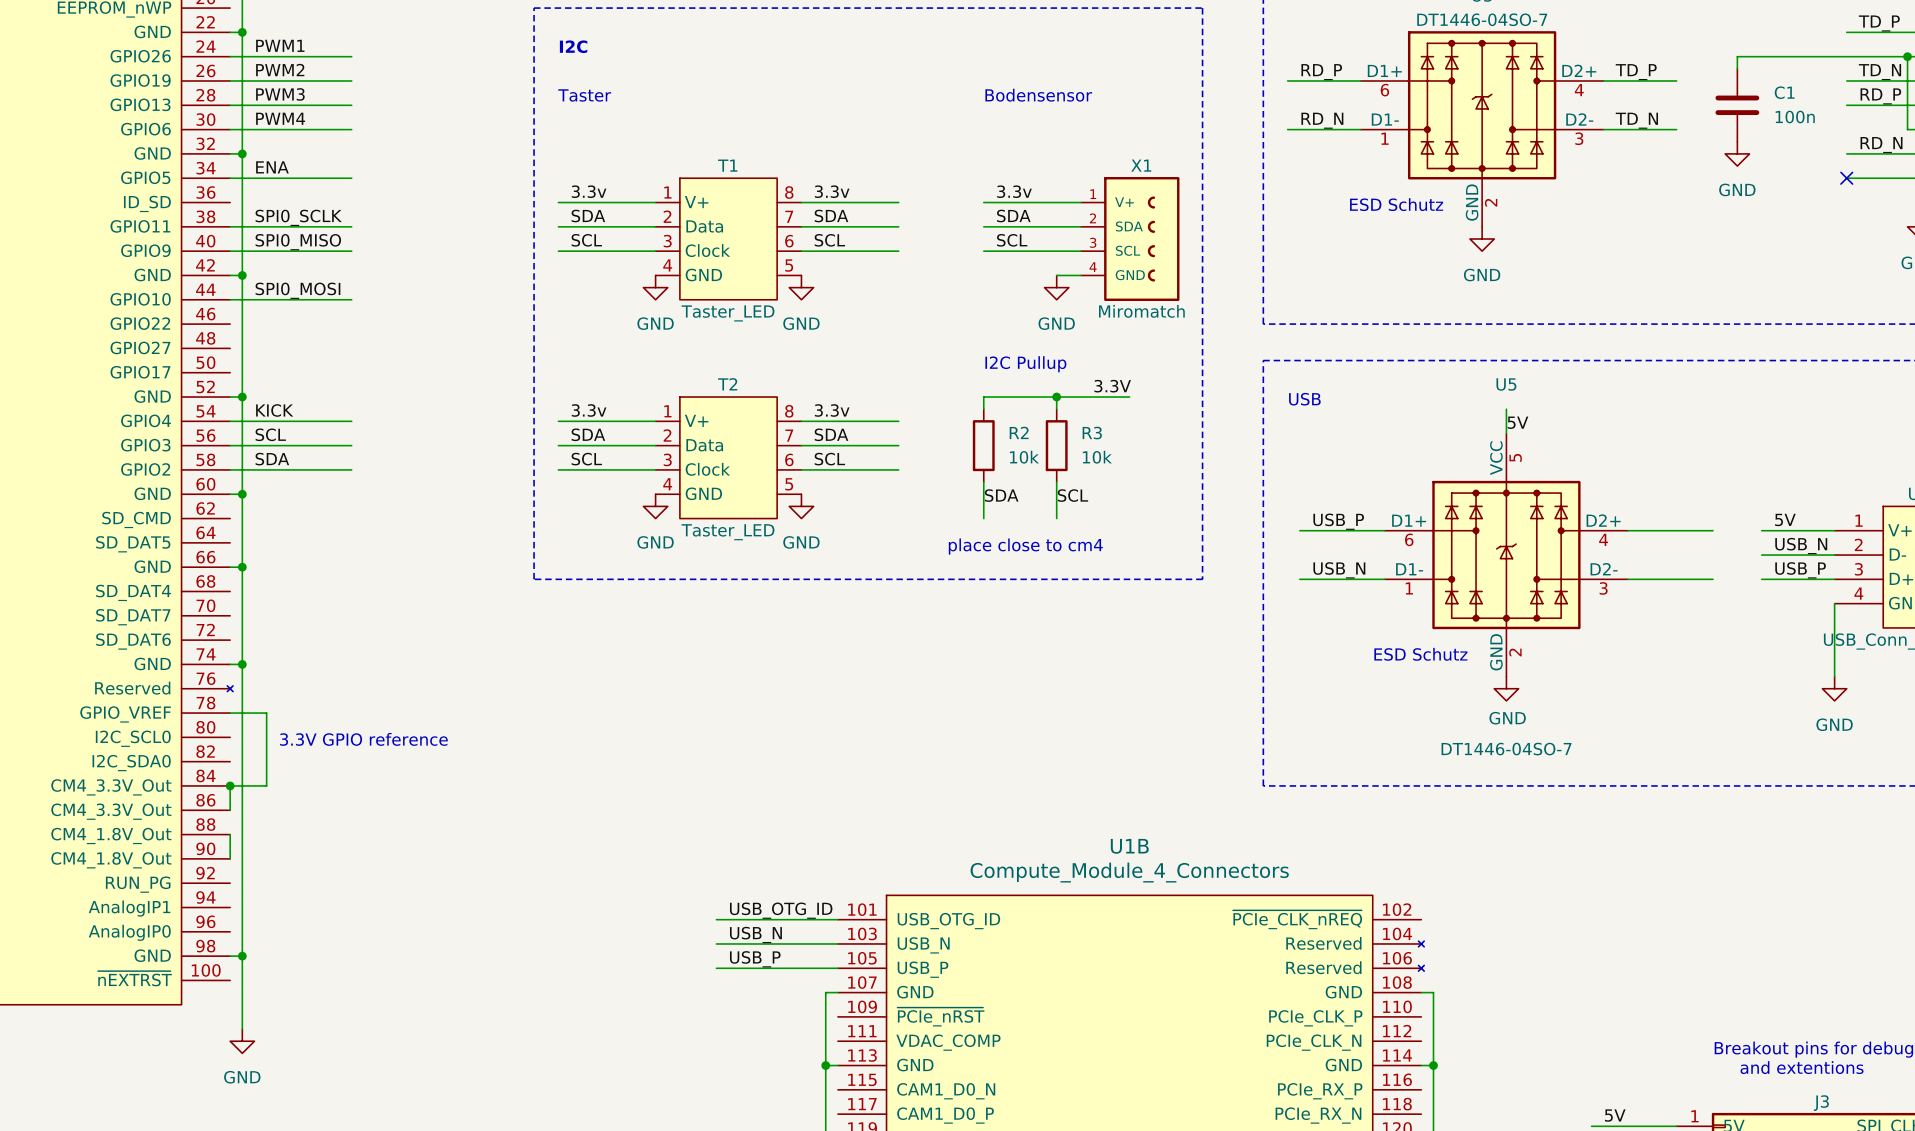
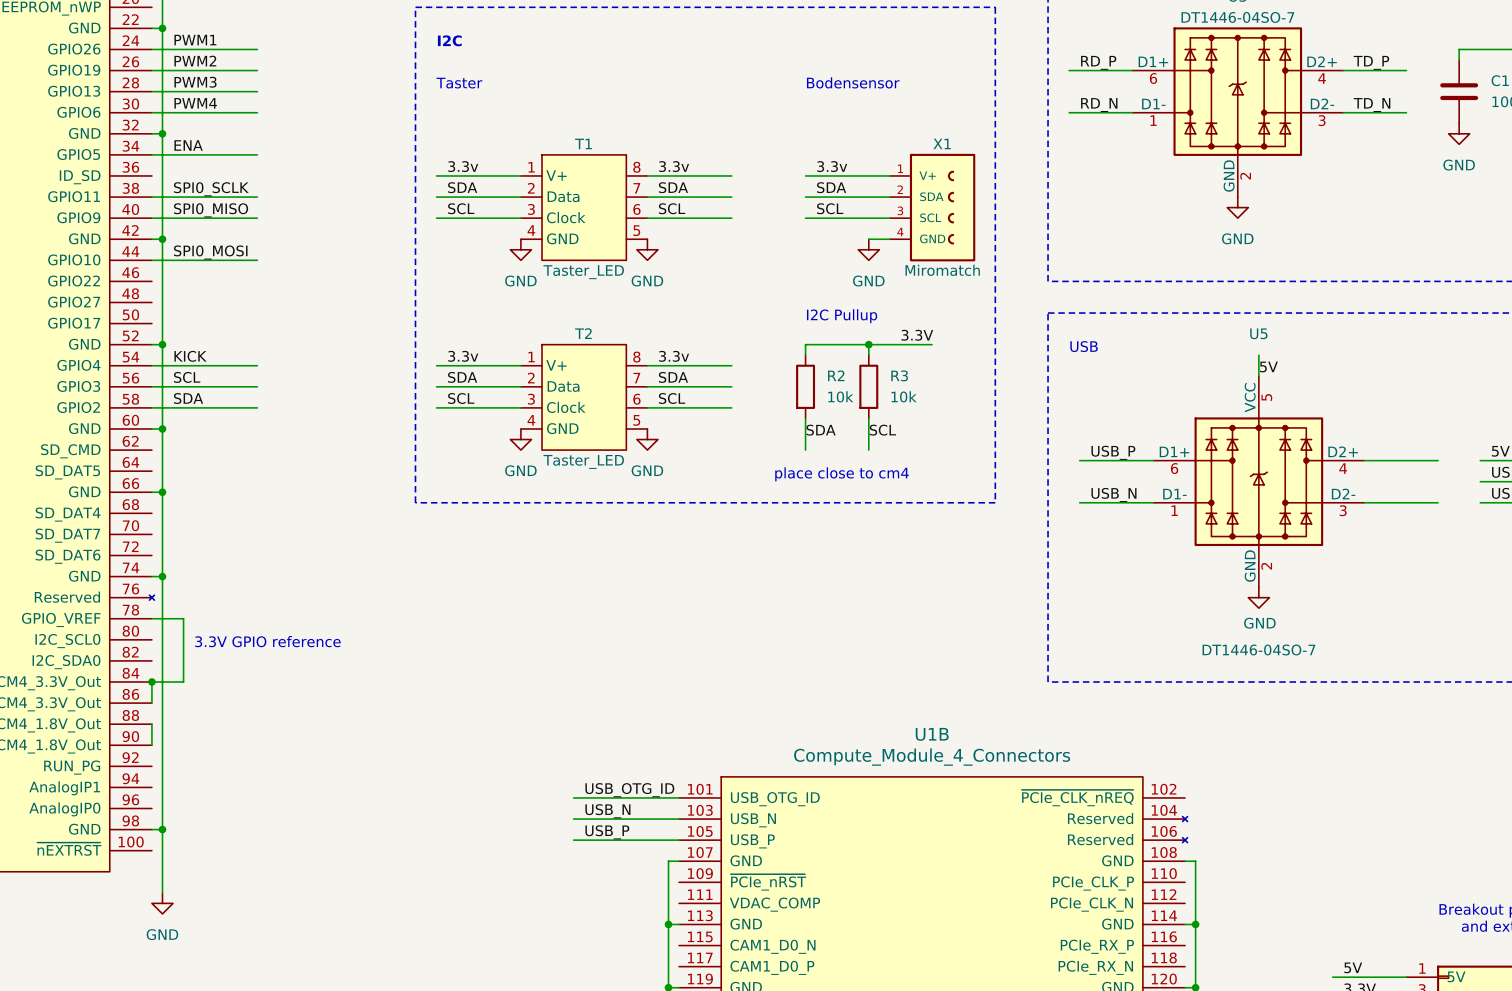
text: ESD Schutz (1396, 204) -> none
text: ESD Schutz (1420, 654) -> none

